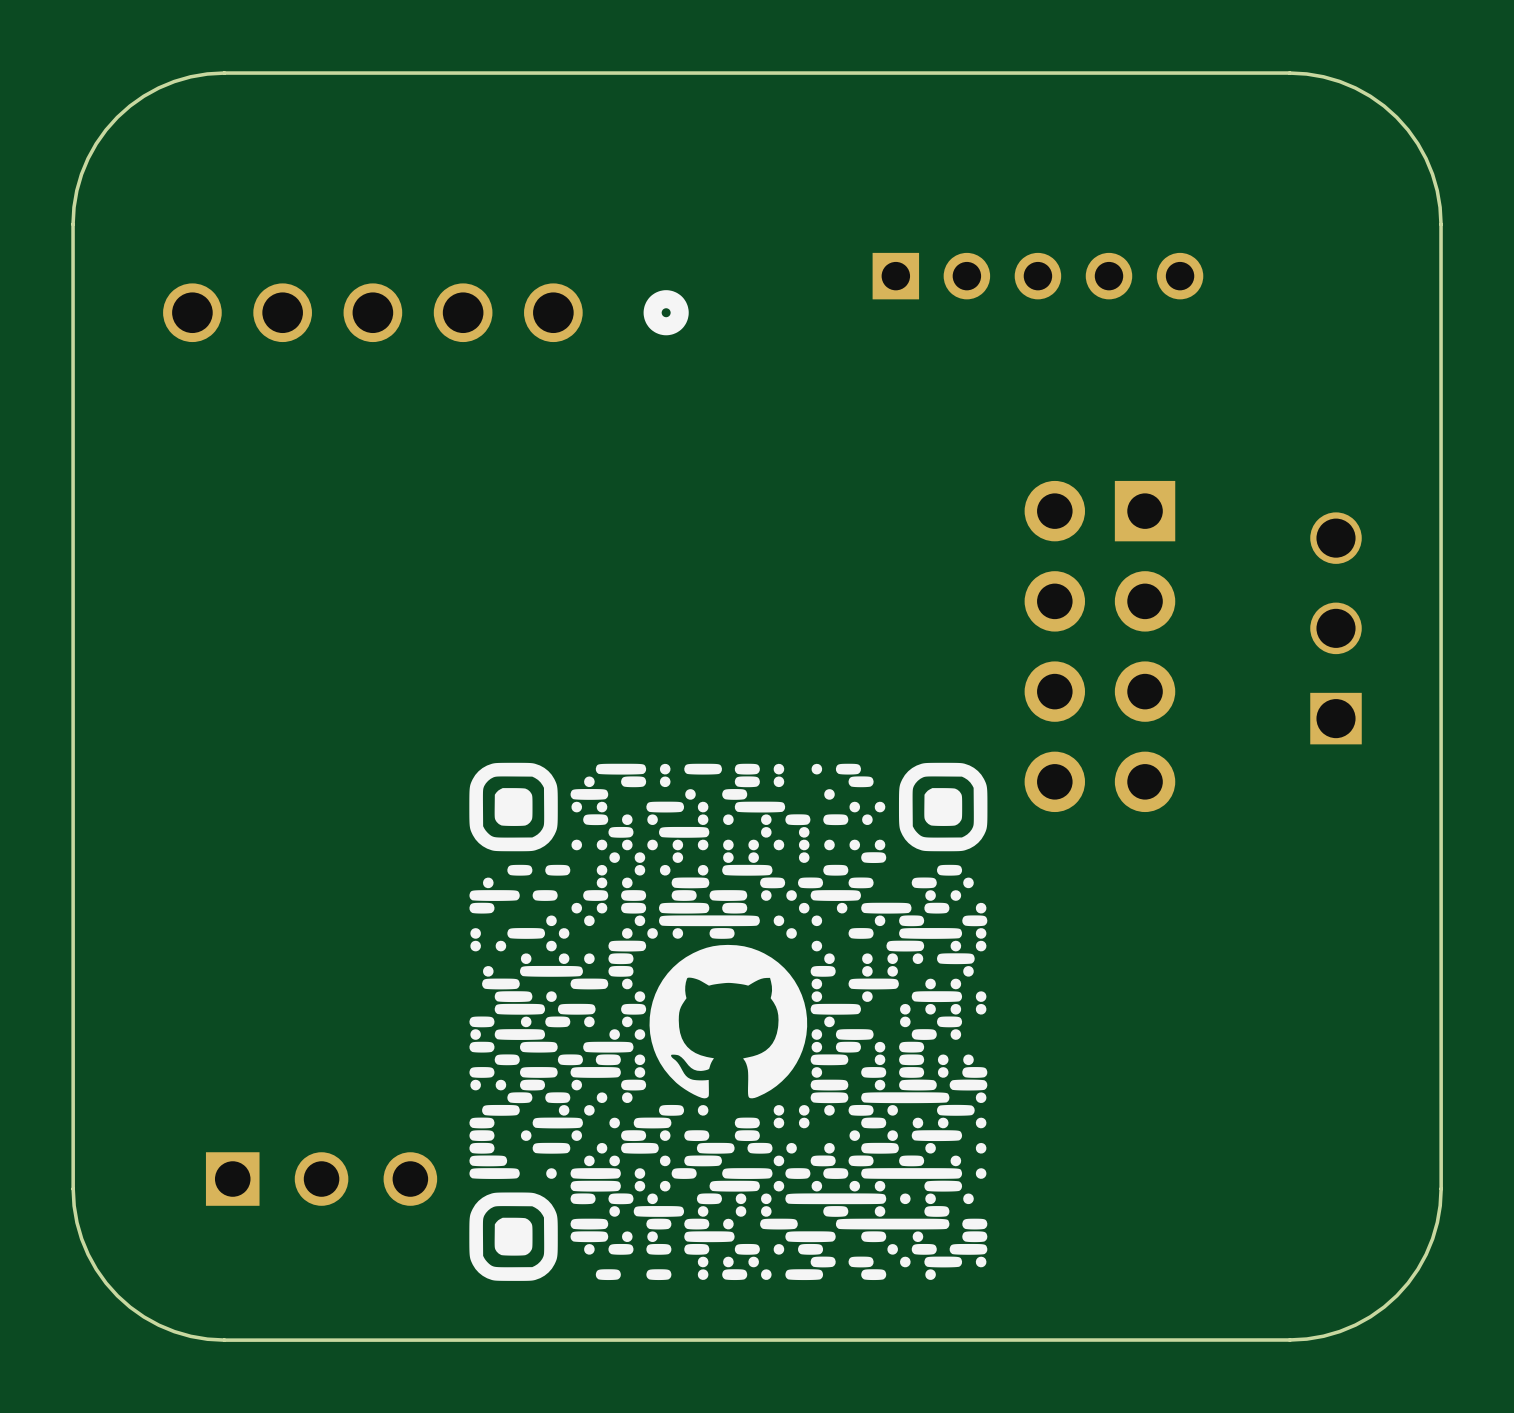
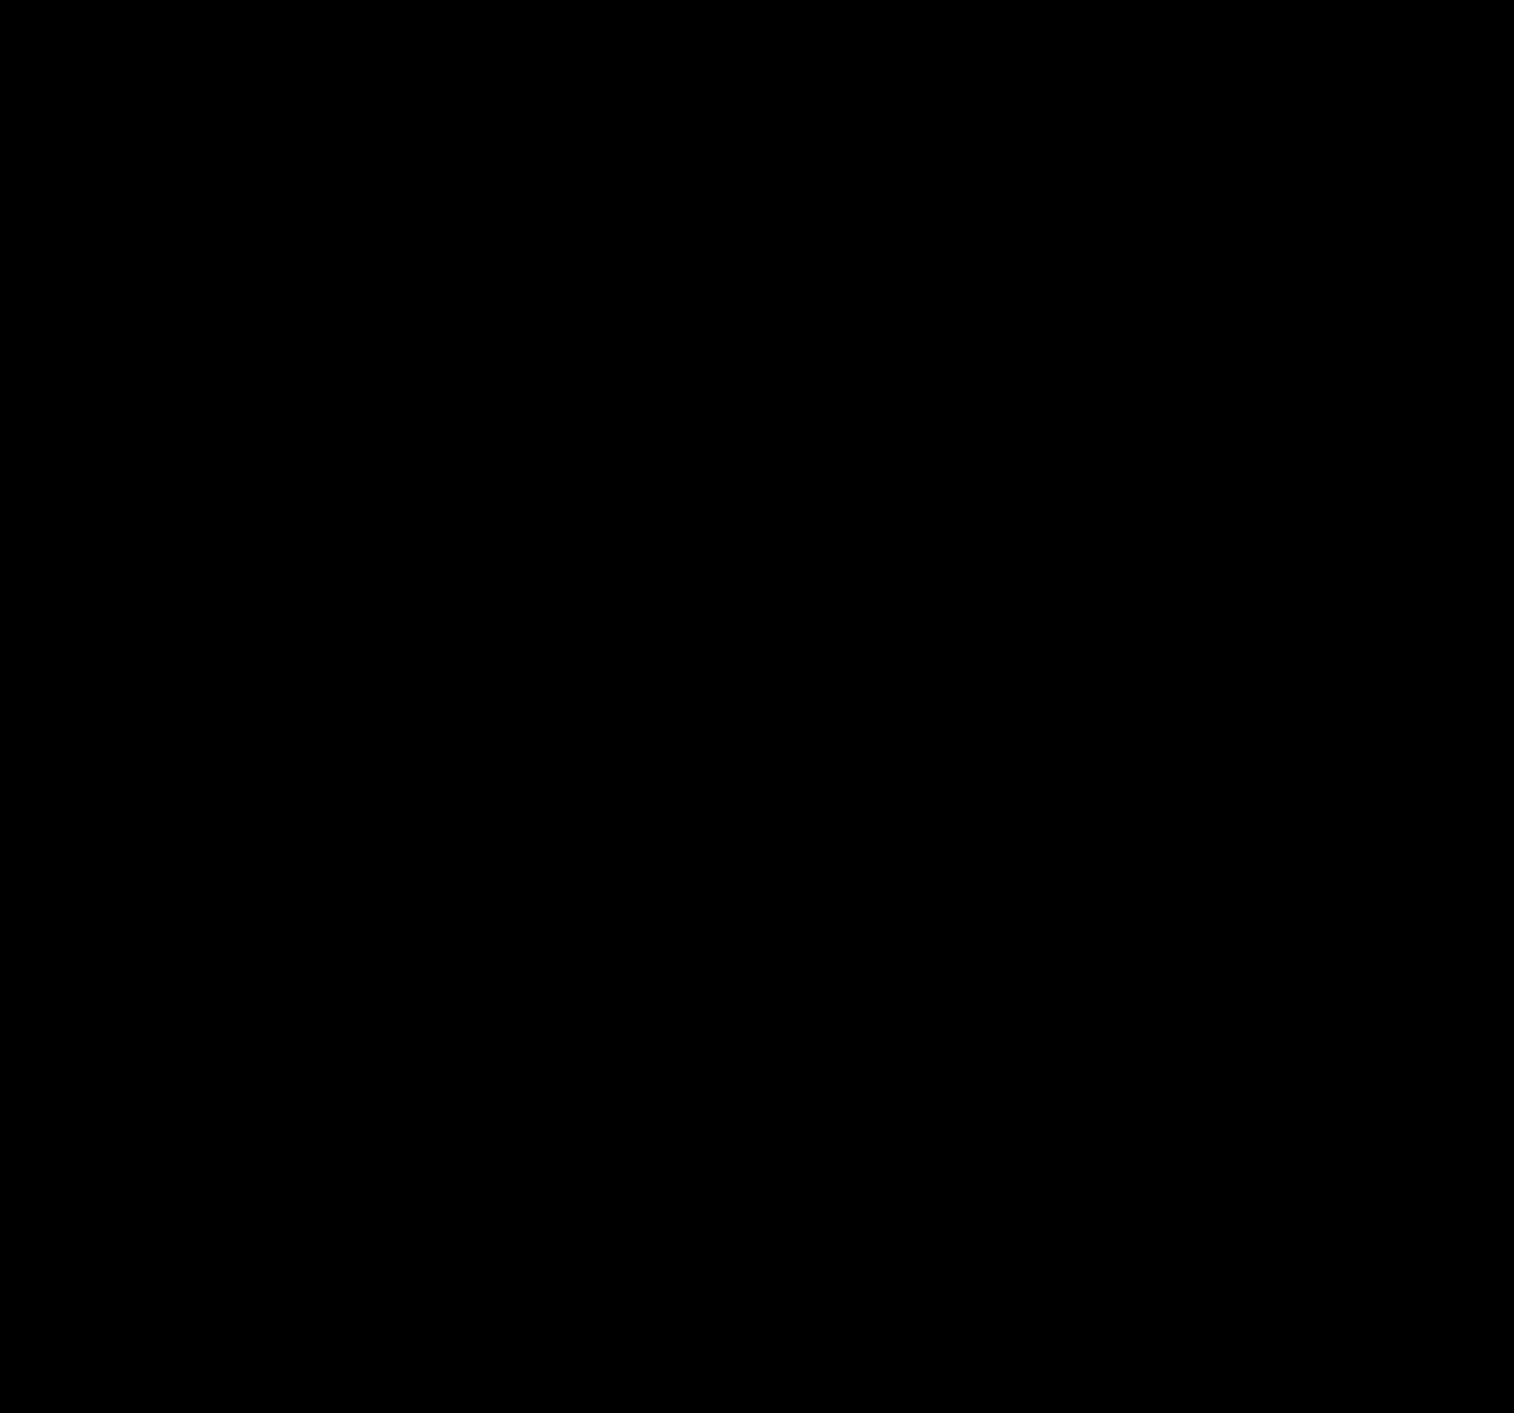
board edge: (1289, 73) (224, 73) (190, 76) (158, 88) (143, 96) (117, 117) (96, 143) (88, 158) (76, 190) (73, 224) (73, 1188) (76, 1222) (81, 1238) (96, 1269) (117, 1295) (143, 1316) (174, 1331) (207, 1339) (224, 1340) (1289, 1340) (1323, 1336) (1339, 1331) (1370, 1316) (1396, 1295) (1417, 1269) (1426, 1254) (1437, 1222) (1441, 1188) (1440, 207) (1432, 174) (1417, 143) (1408, 129) (1384, 106) (1355, 88) (1339, 81) (1306, 73) (1289, 73) -> none
part: (1037, 276) -> none
part: (425, 312) -> none
part: (1336, 628) -> none
part: (1099, 646) -> none
drawing: [469, 762, 988, 1281] -> none
part: (321, 1179) -> none

